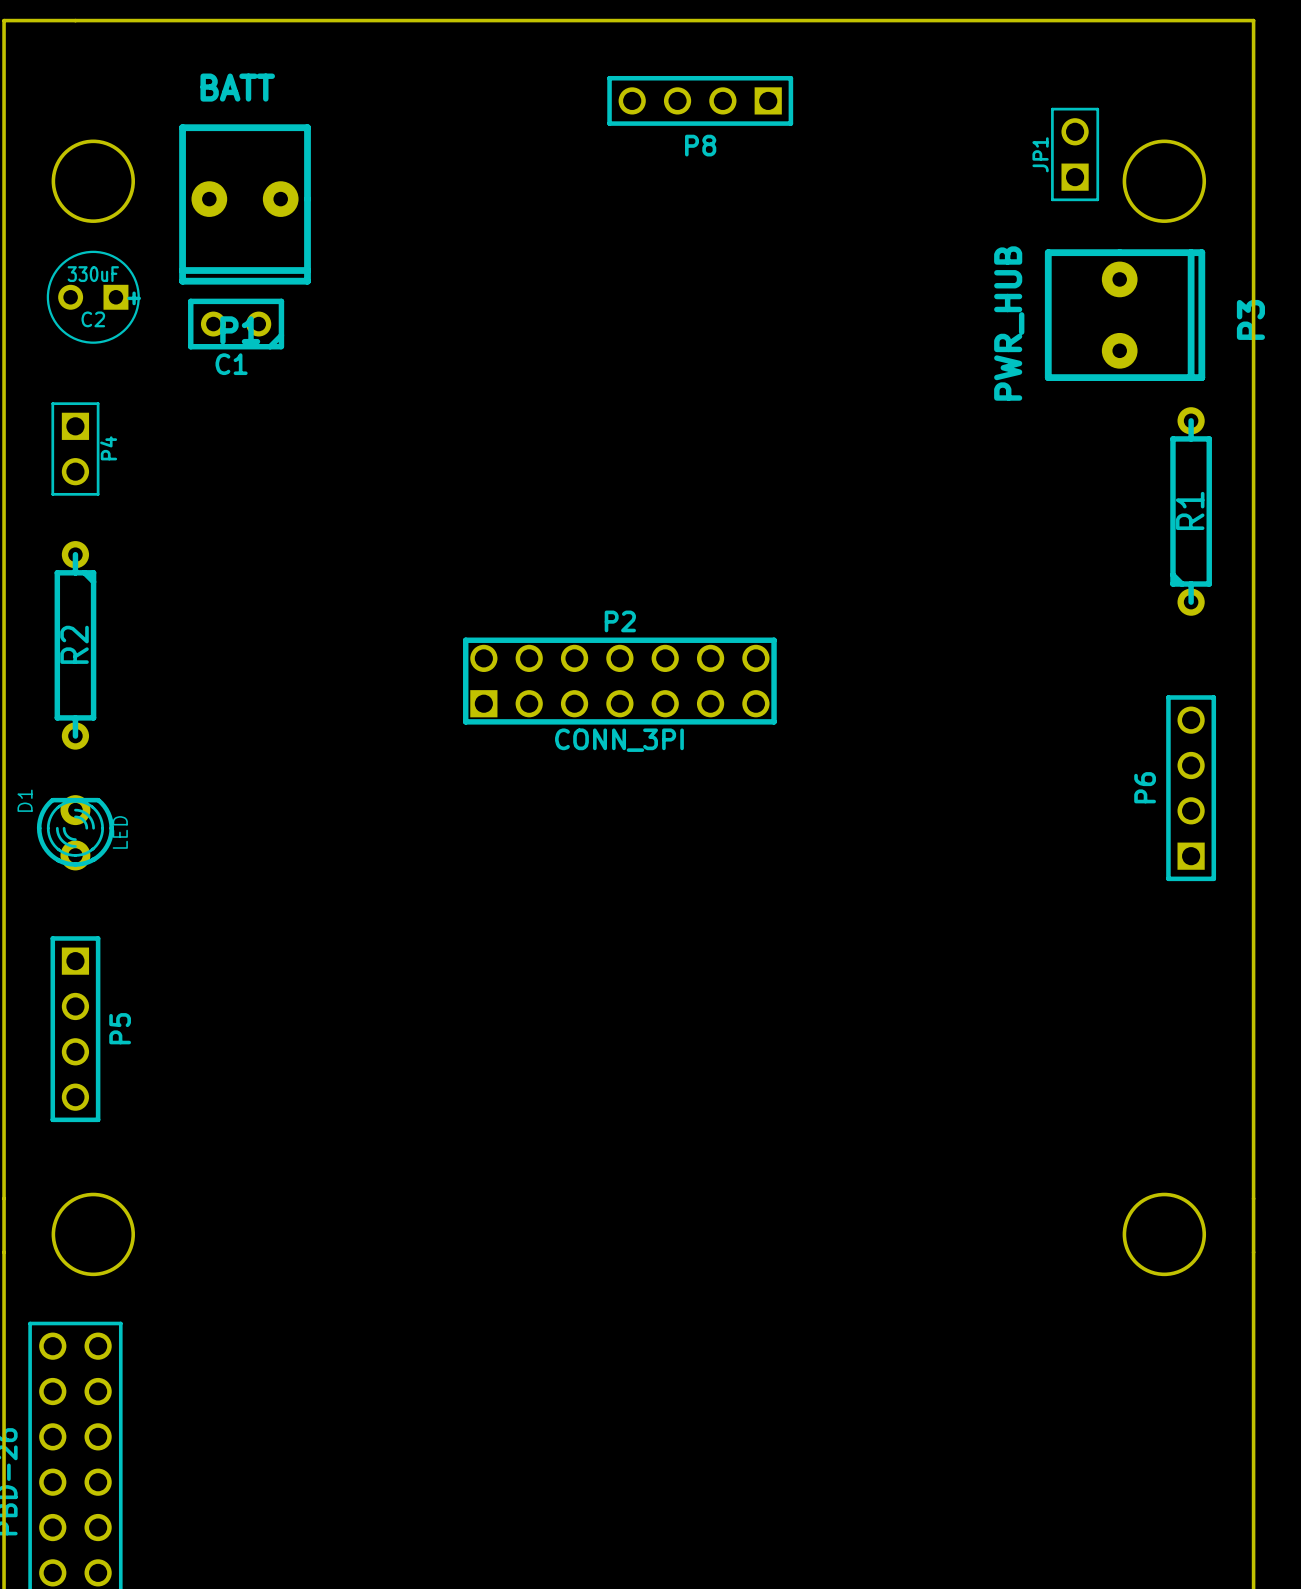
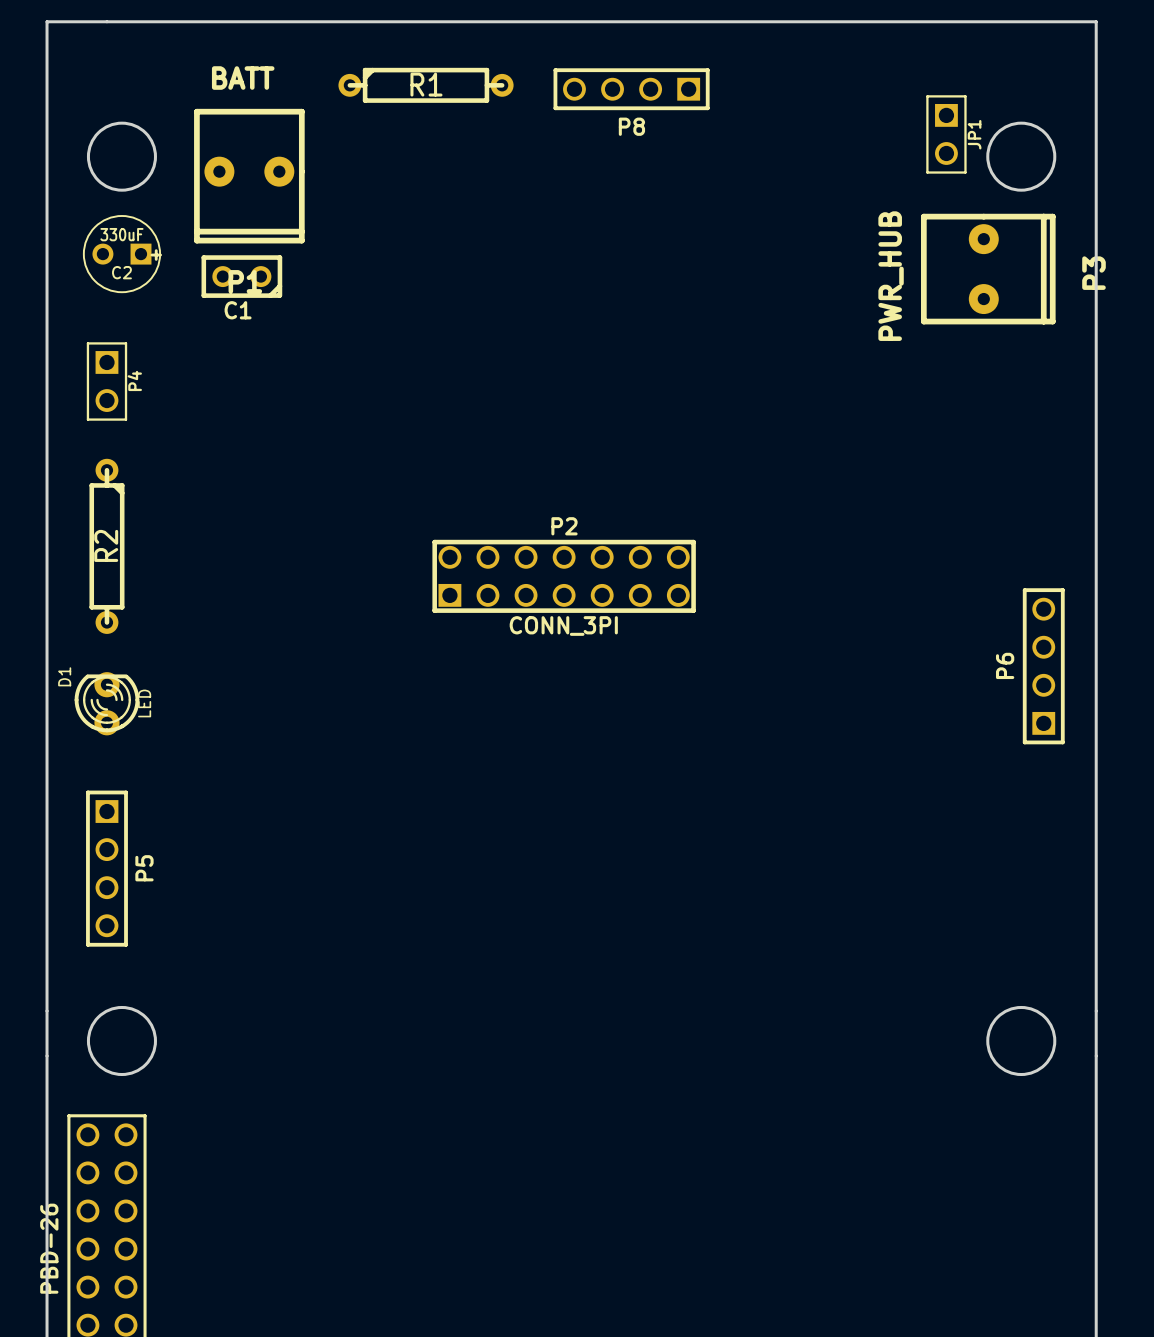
JP1 rotation: 0° (1075, 154) -> 180° (946, 134)
R1 rotation: 0° (1191, 511) -> 90° clockwise (426, 85)
R1 position: (1191, 511) -> (426, 85)

